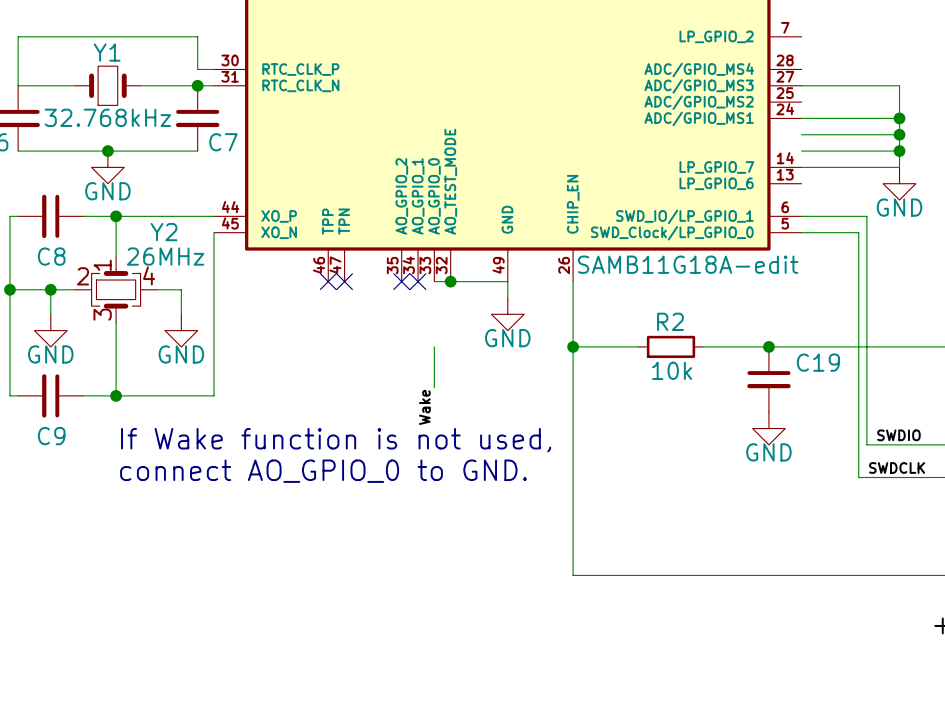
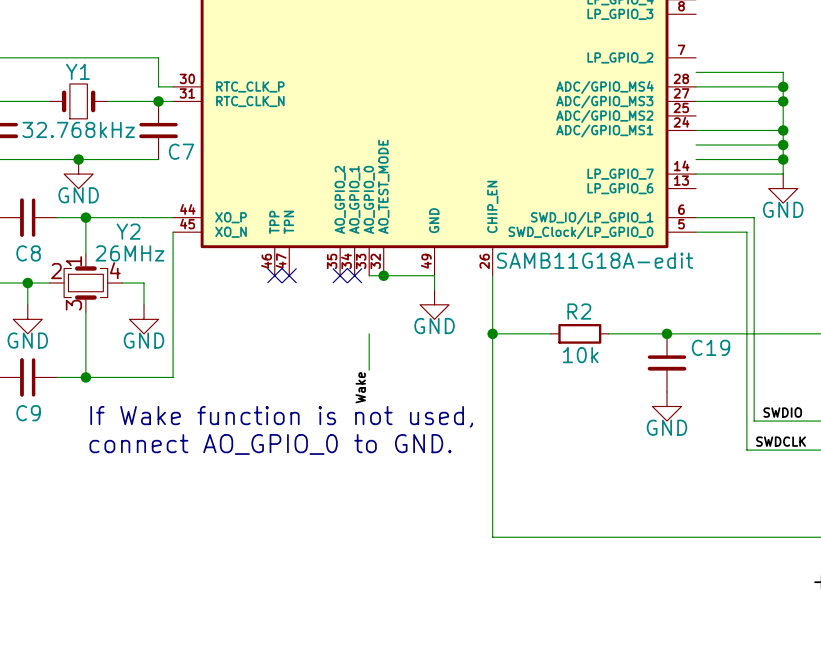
wire: none -> (696, 72) (783, 72) (783, 101)
wire: none -> (696, 86) (783, 86)
junction: none -> (783, 86)
junction: none -> (783, 101)

